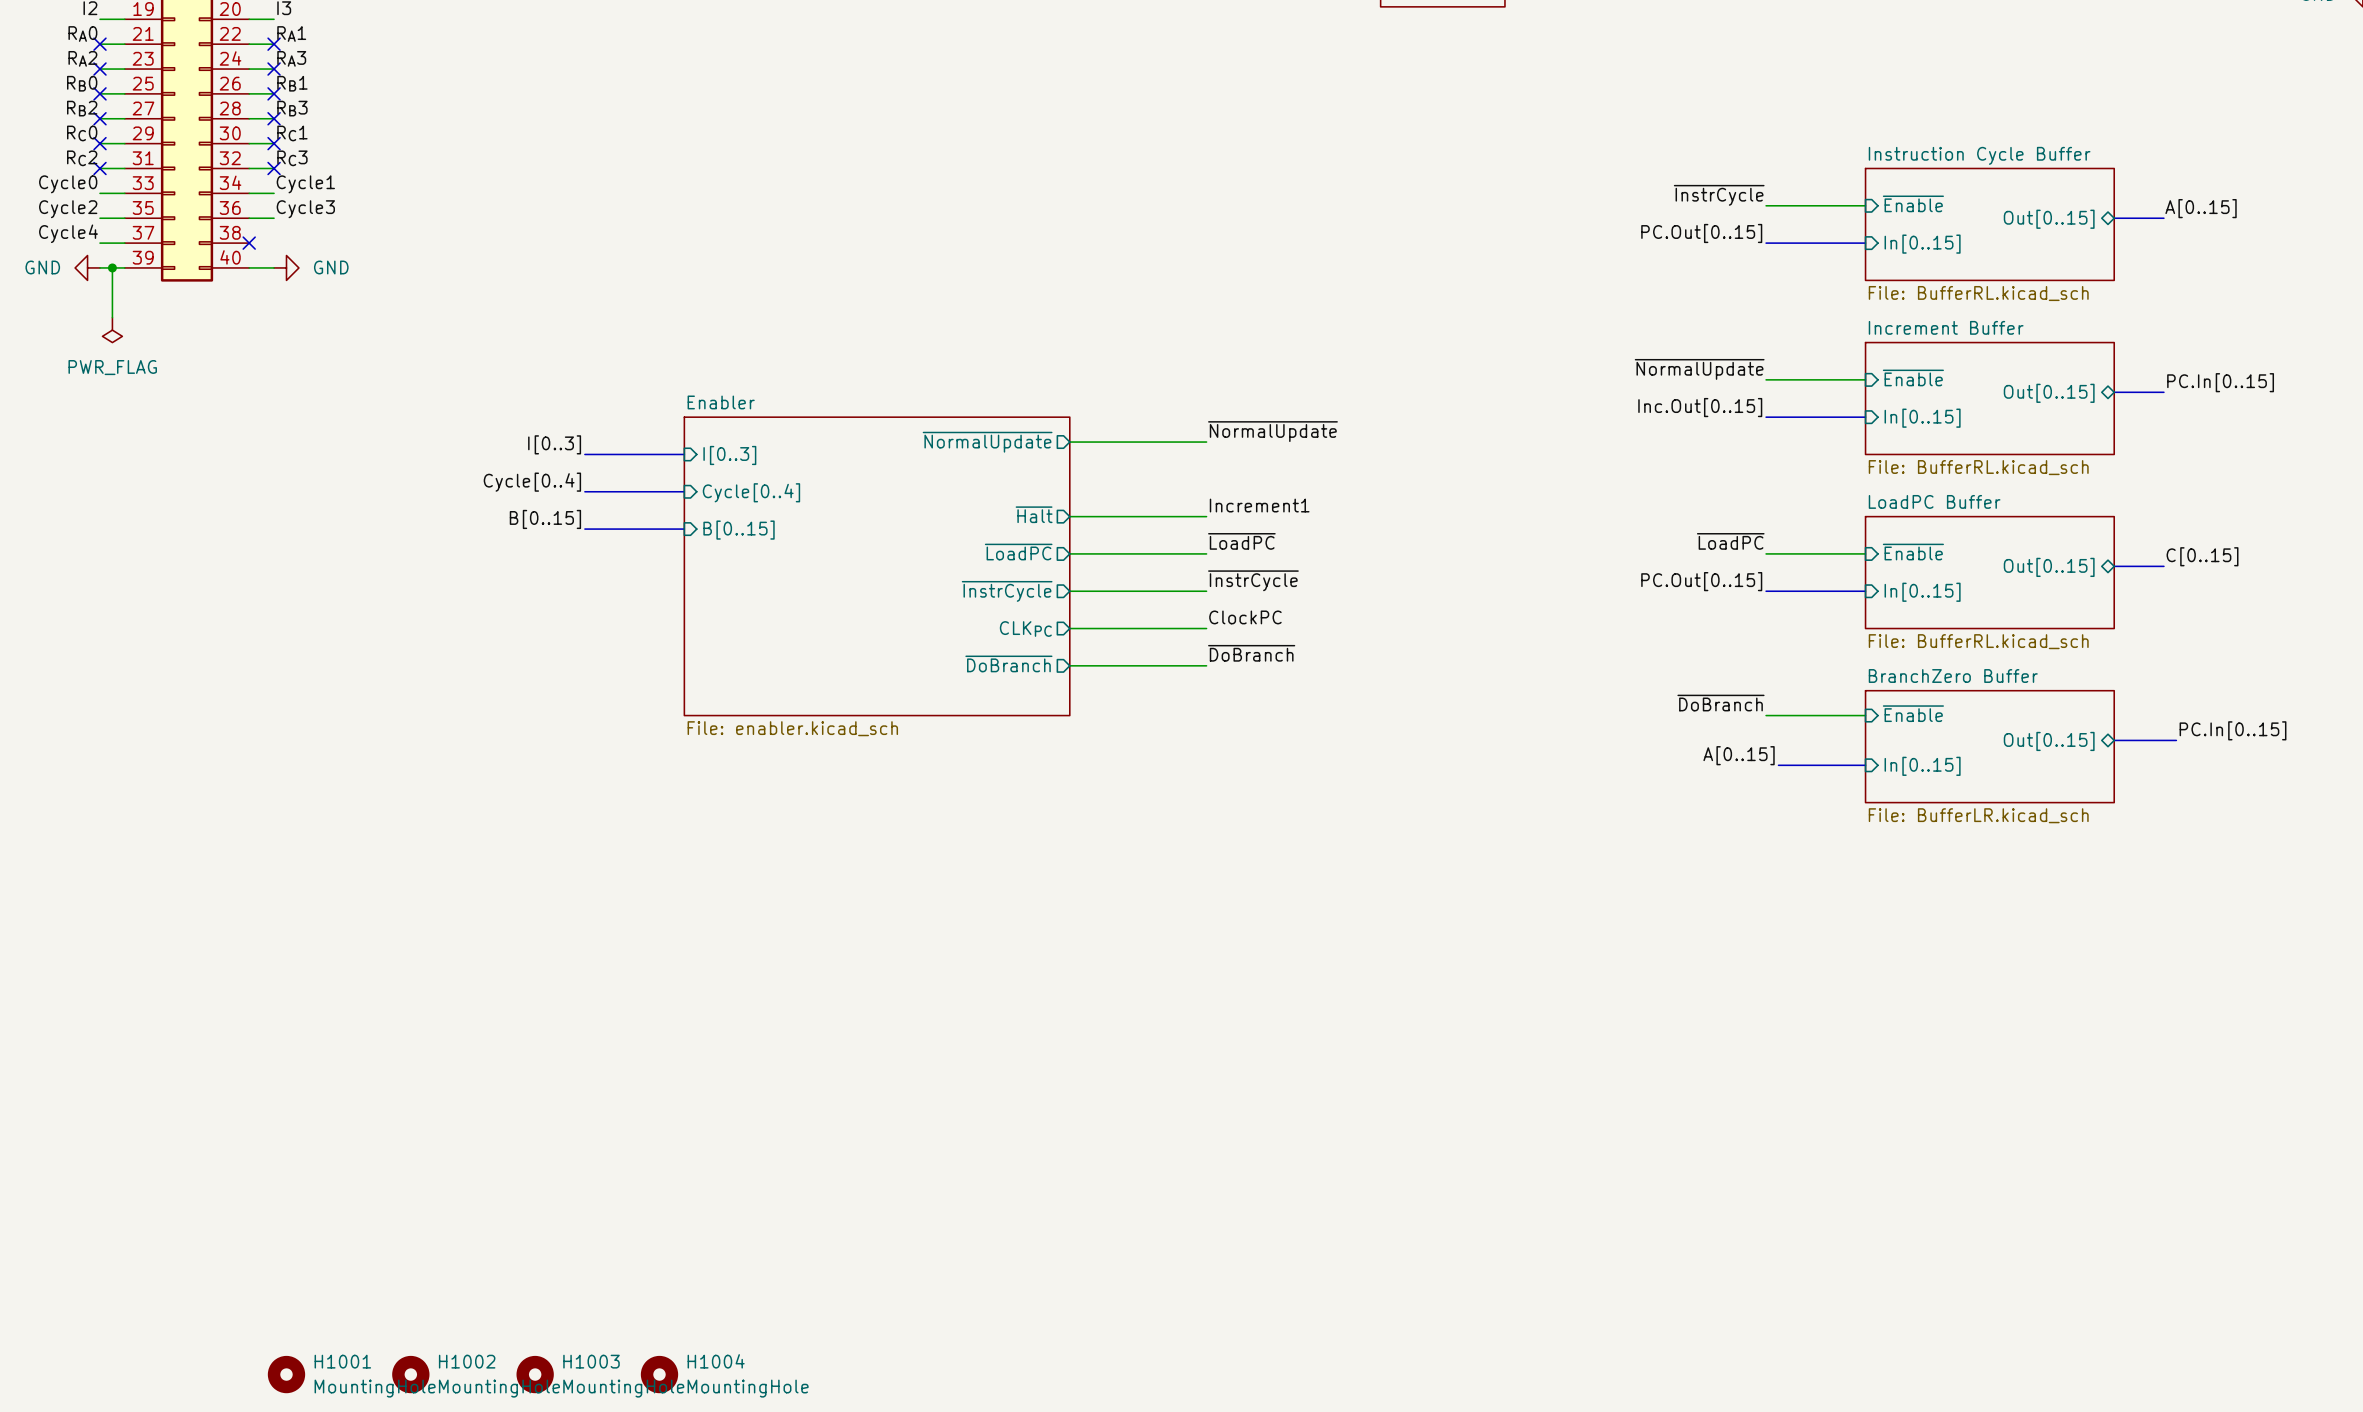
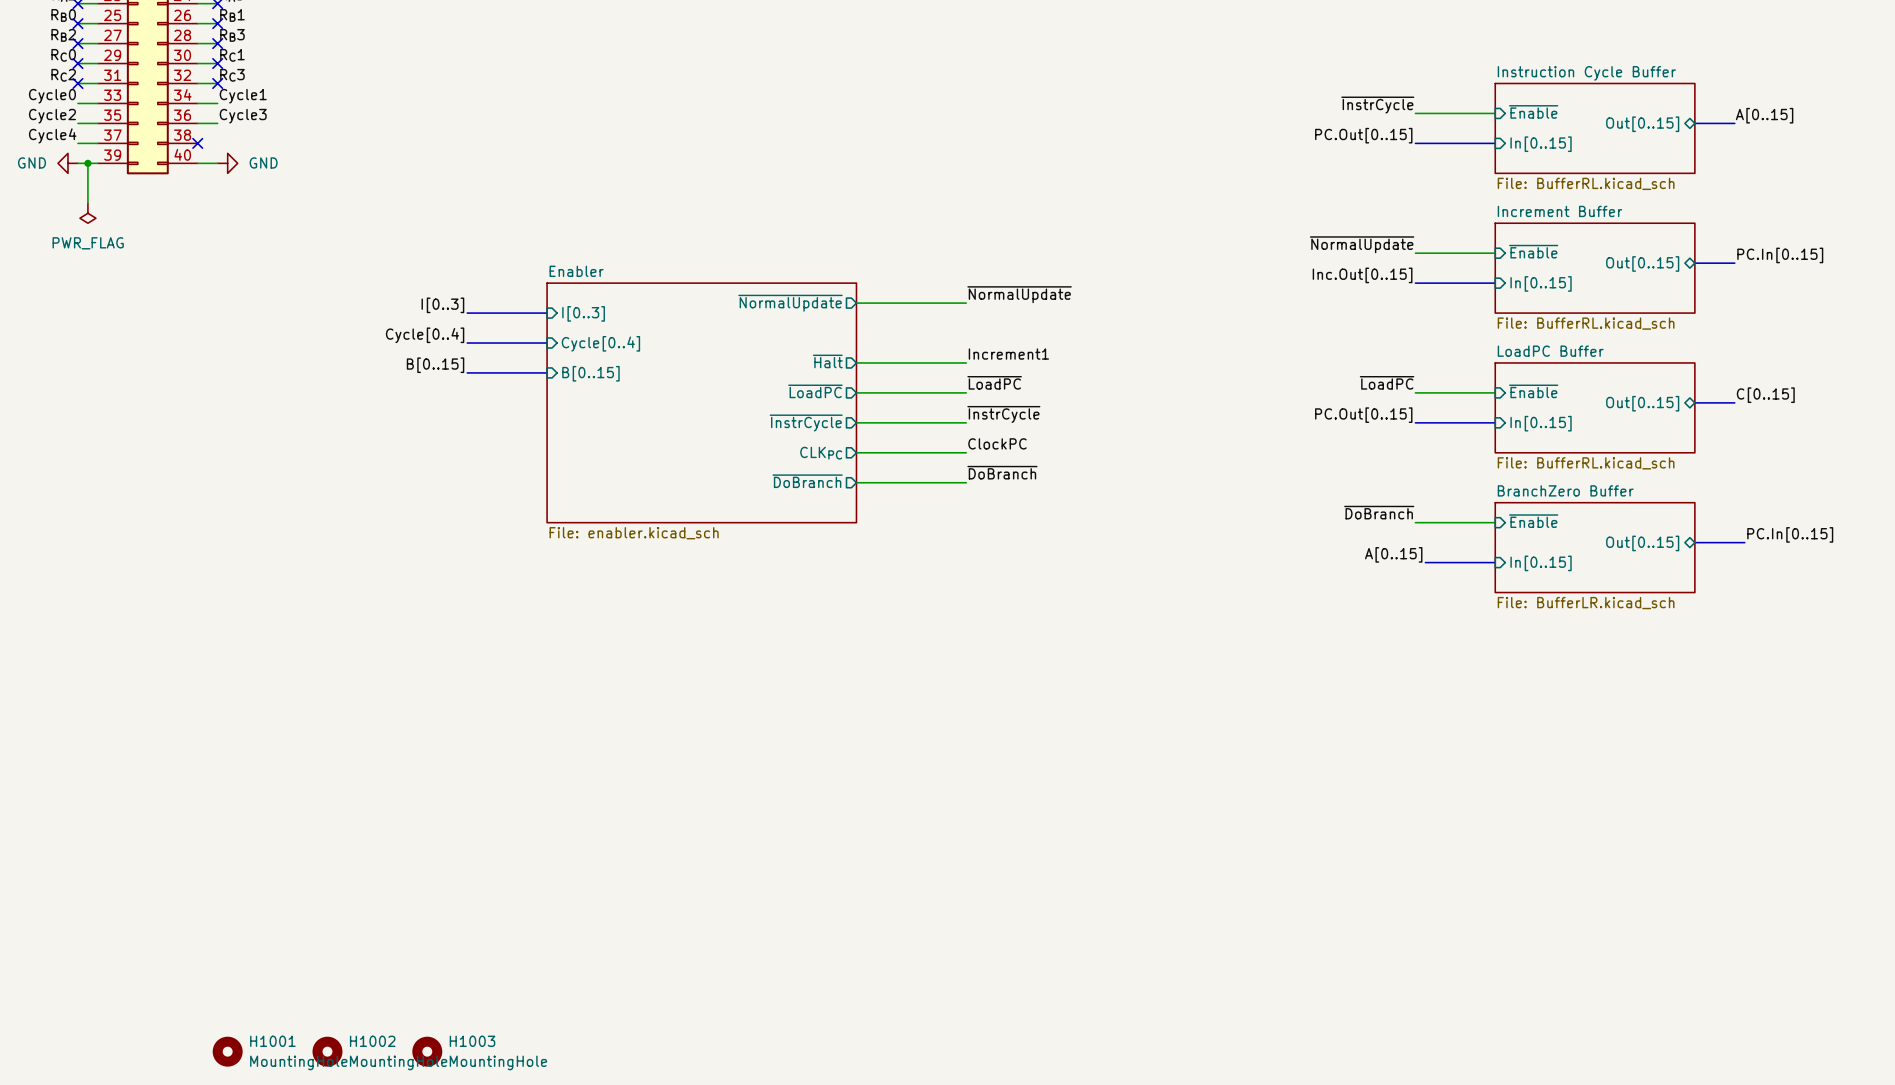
H1004: MountingHole (659, 1374) -> none

